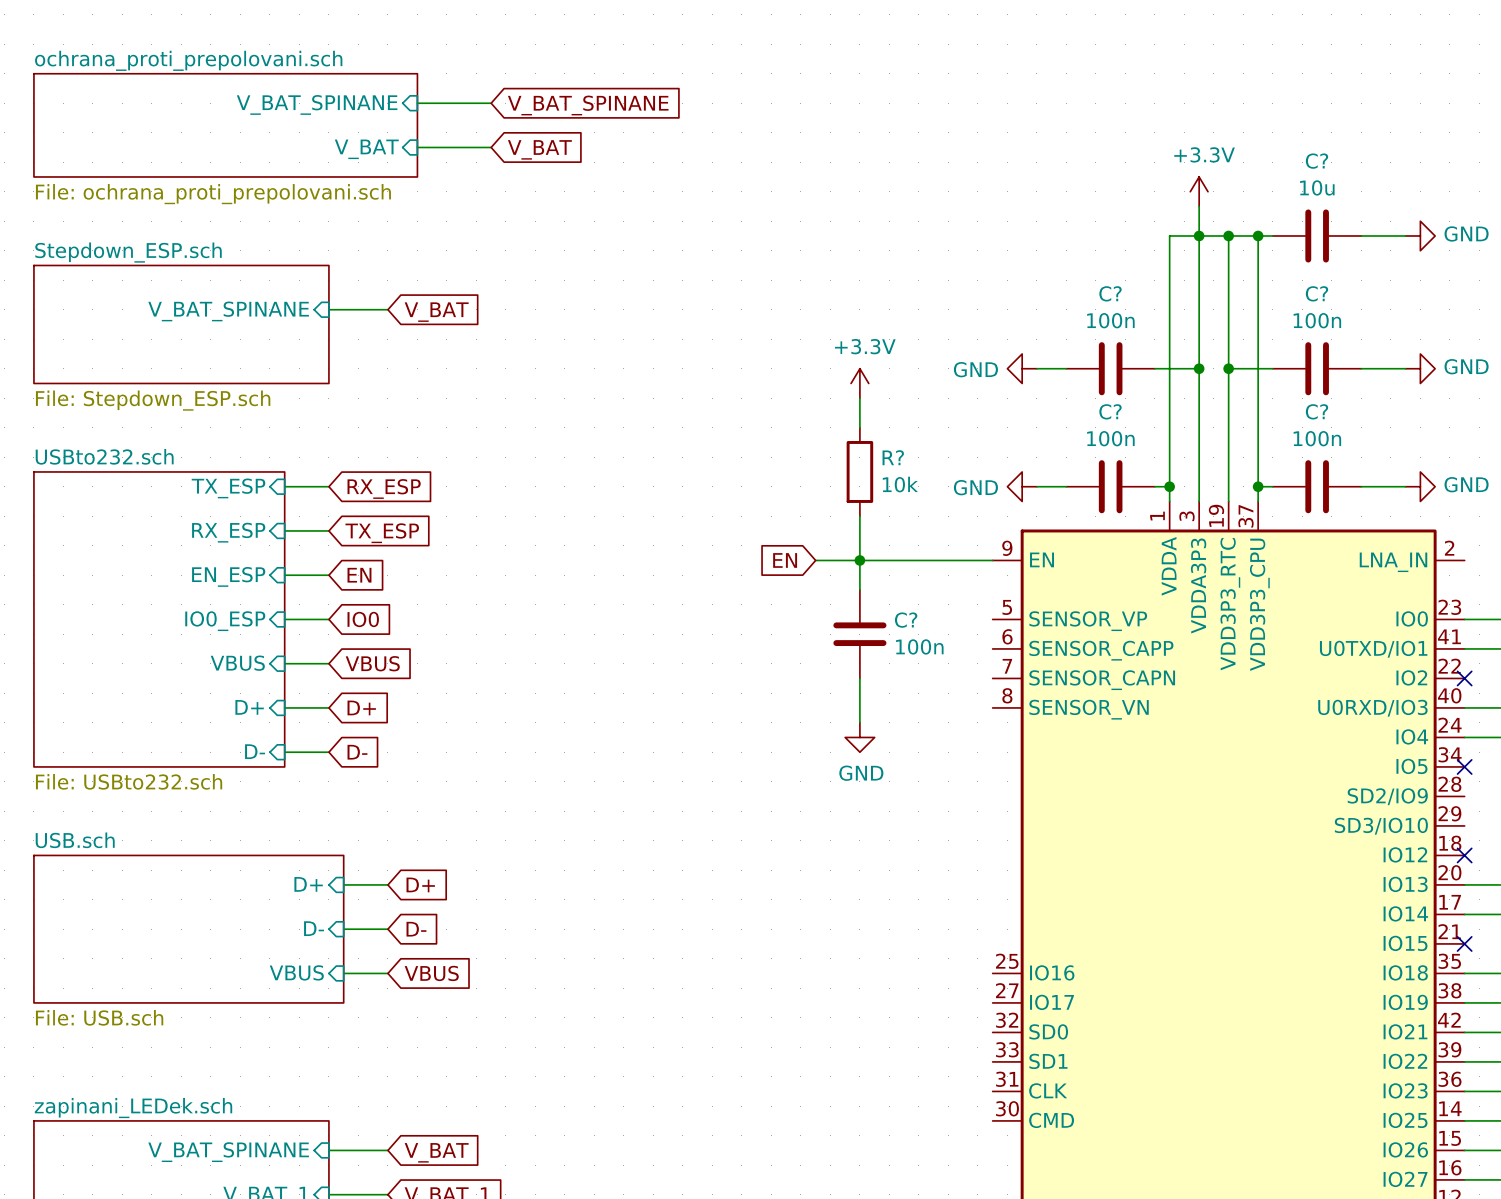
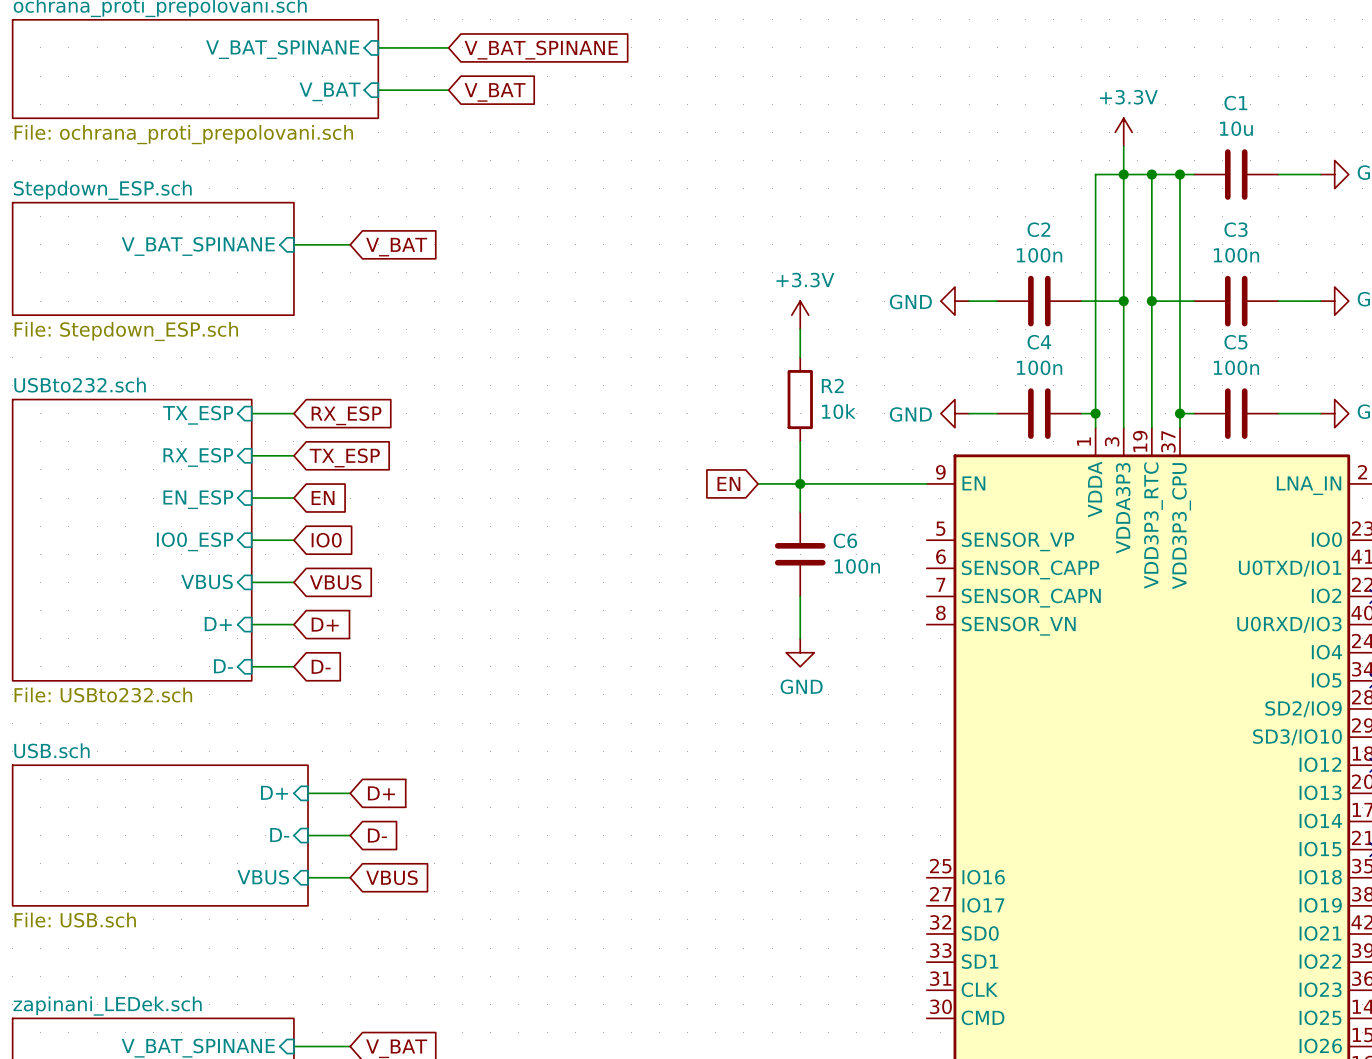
C? name: C? (1317, 161) -> C1 (1235, 103)
C? name: C? (1110, 293) -> C2 (1038, 229)
C? name: C? (1317, 293) -> C3 (1236, 229)
C? name: C? (1110, 411) -> C4 (1039, 342)
C? name: C? (1317, 411) -> C5 (1235, 342)
R? name: R? (893, 457) -> R2 (832, 385)
C? name: C? (906, 620) -> C6 (845, 540)

